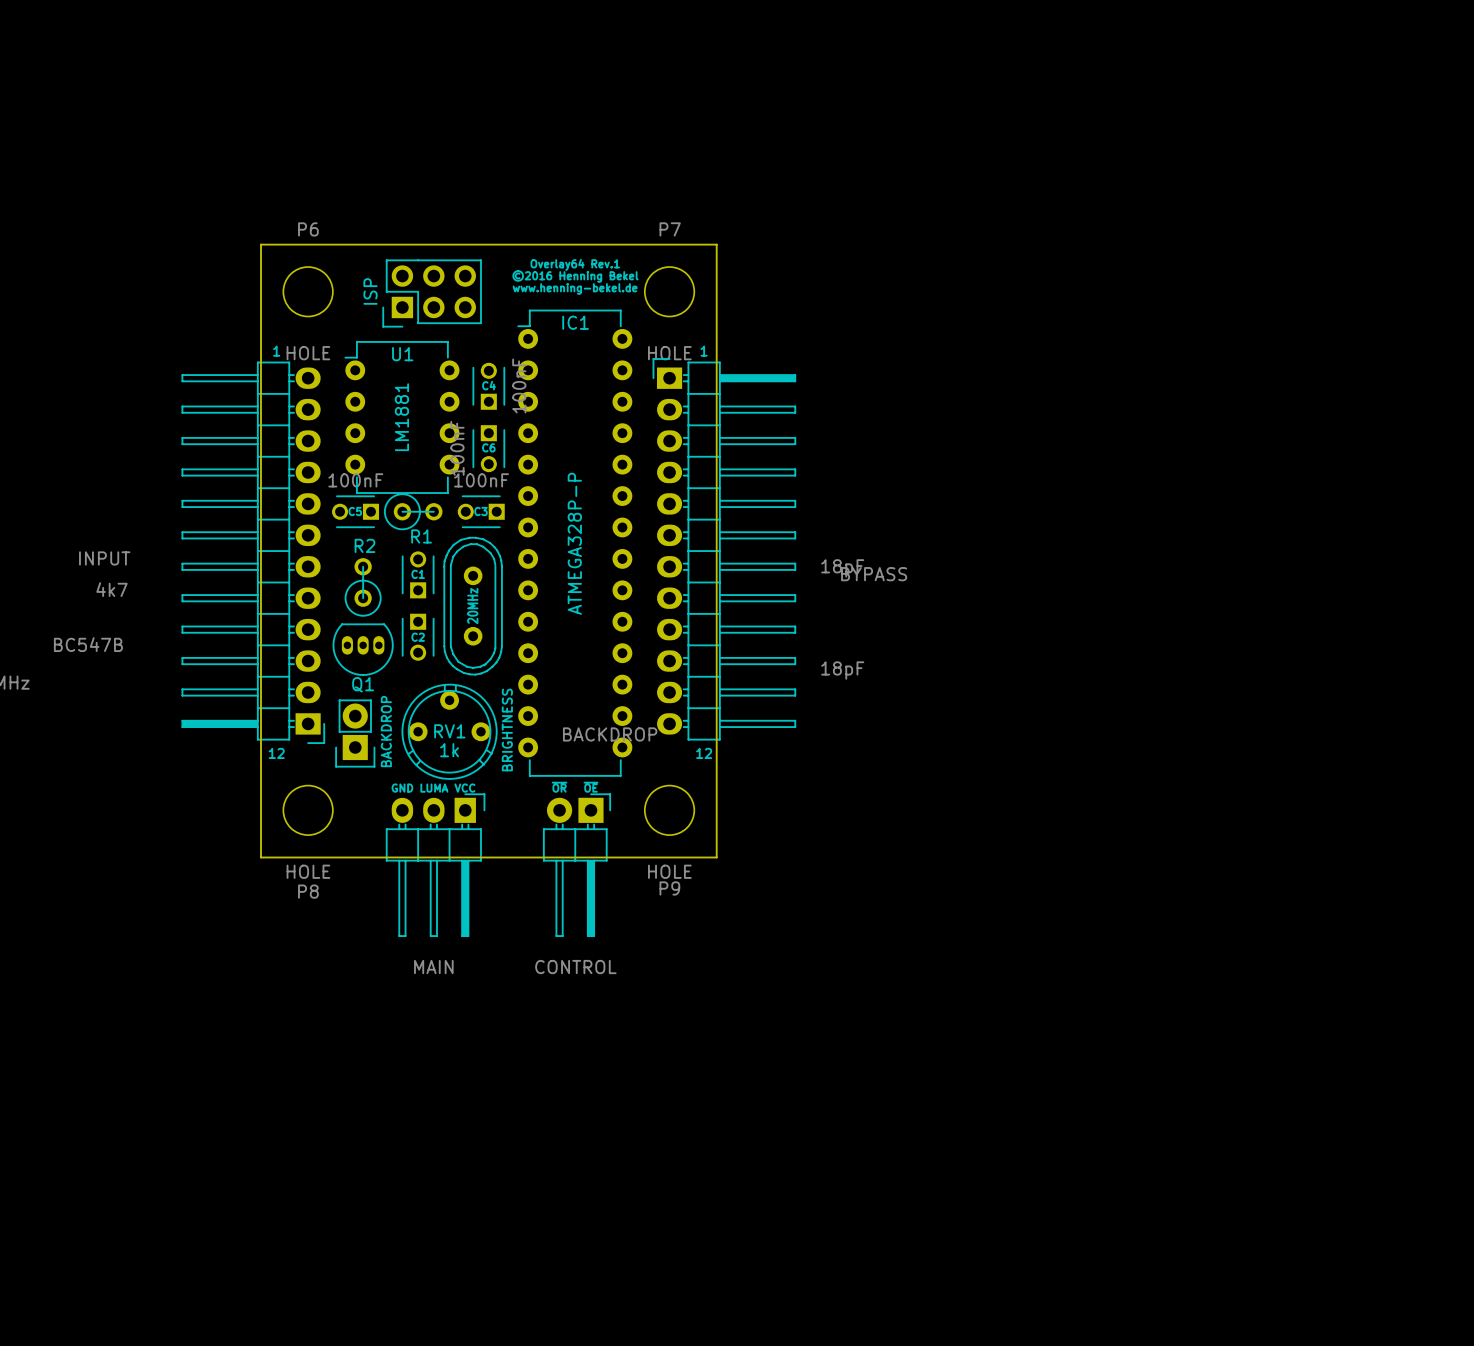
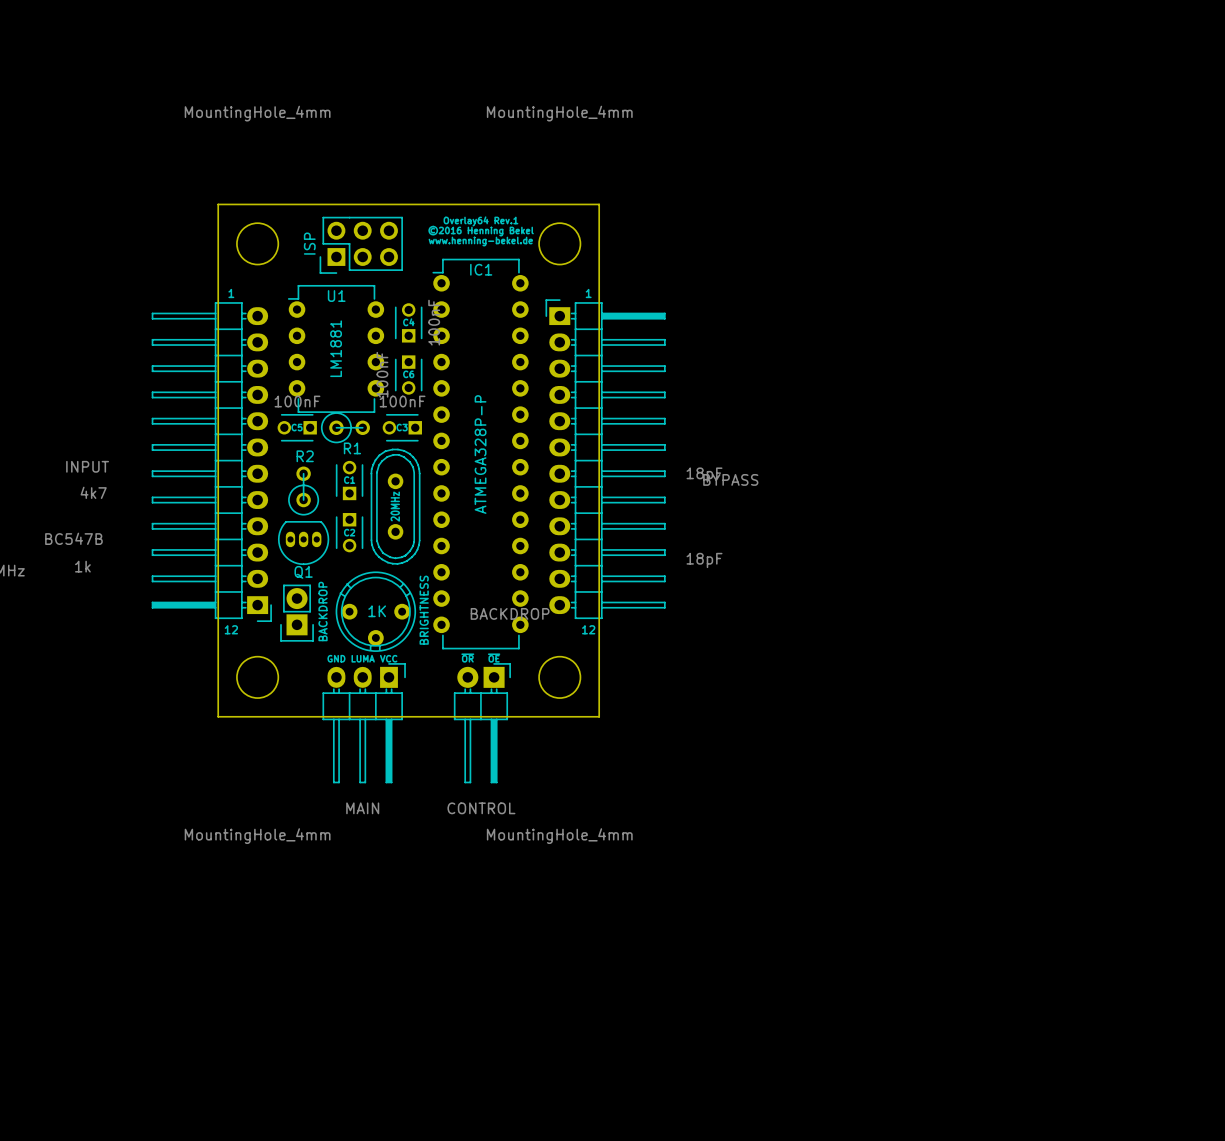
P6 name: P6 (308, 229) -> none
P7 name: P7 (670, 229) -> none
P6 value: HOLE (308, 353) -> MountingHole_4mm (257, 113)
P7 value: HOLE (669, 353) -> MountingHole_4mm (559, 113)
RV1: 1k (449, 731) -> none
1K: none -> 1k (375, 611)
P8 value: HOLE (308, 871) -> MountingHole_4mm (257, 836)
P9 value: HOLE (669, 871) -> MountingHole_4mm (559, 836)
P9 name: P9 (669, 888) -> none
P8 name: P8 (308, 891) -> none

